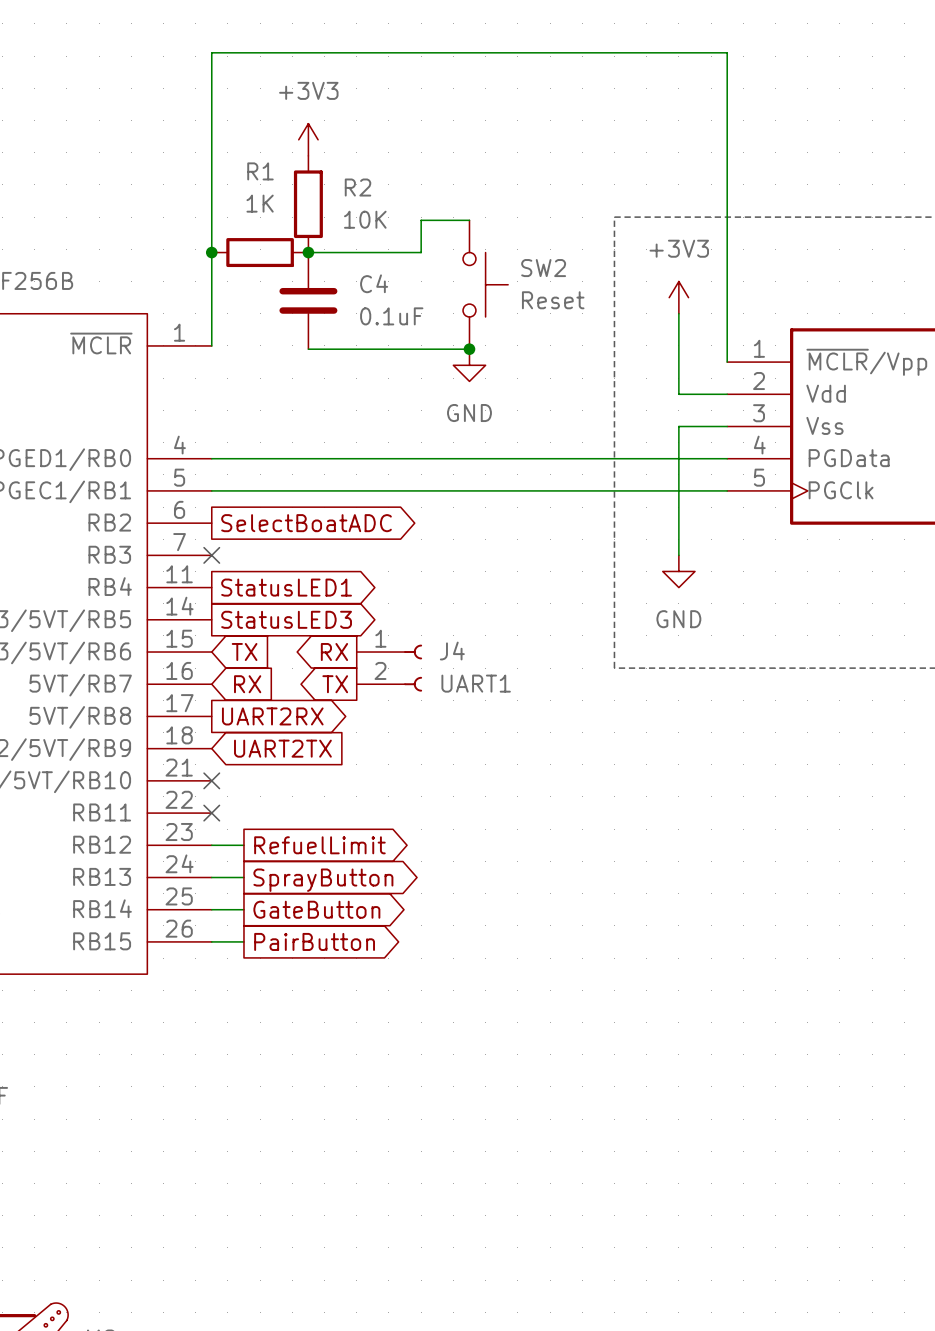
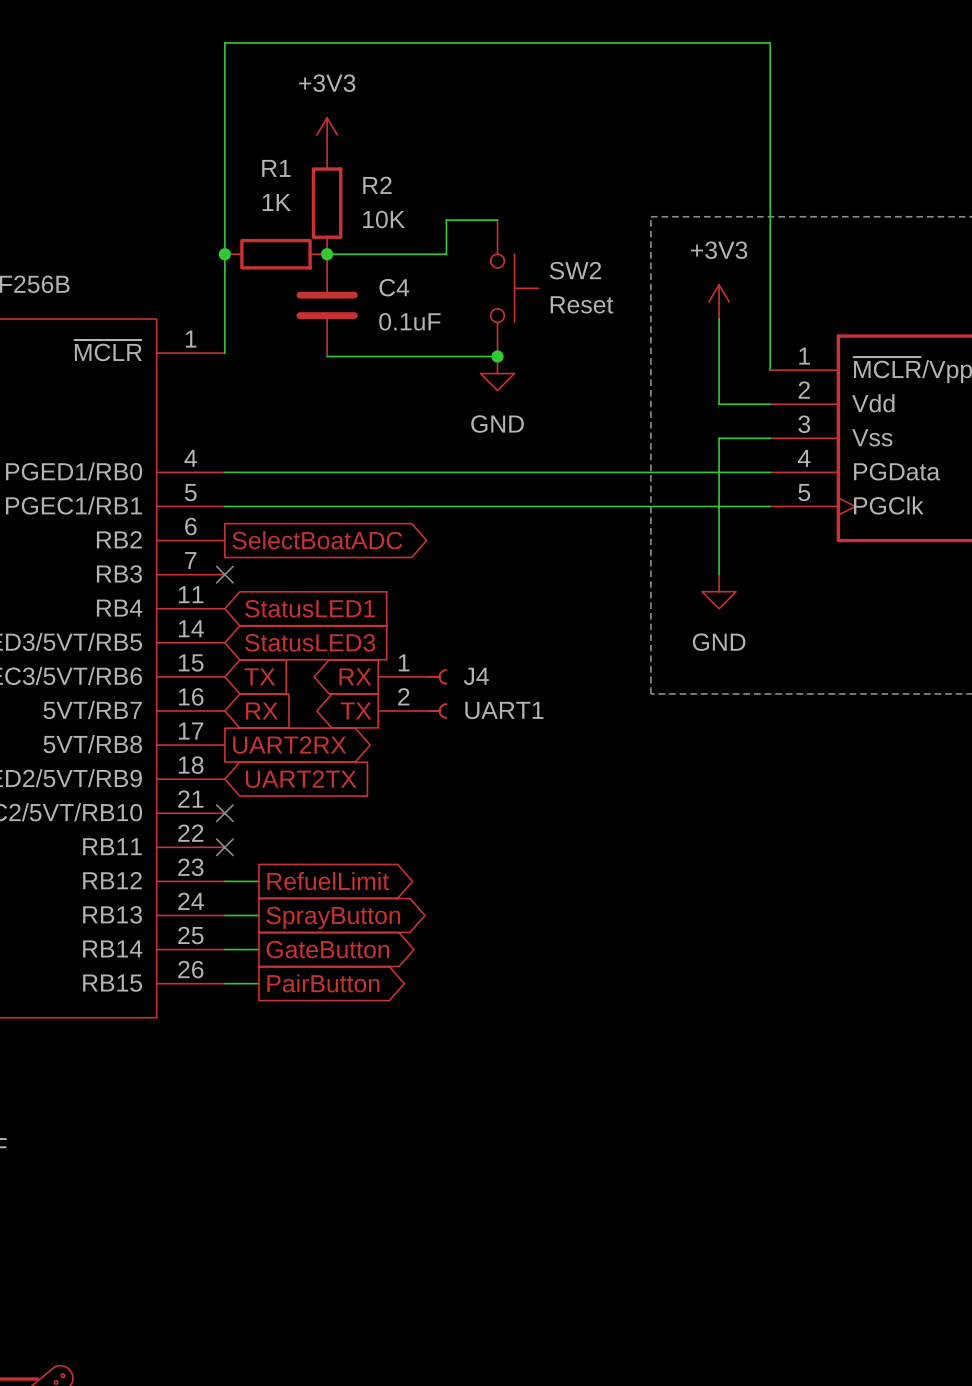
global label shape: output (286, 587) -> input (310, 608)
global label shape: output (286, 619) -> input (310, 642)

